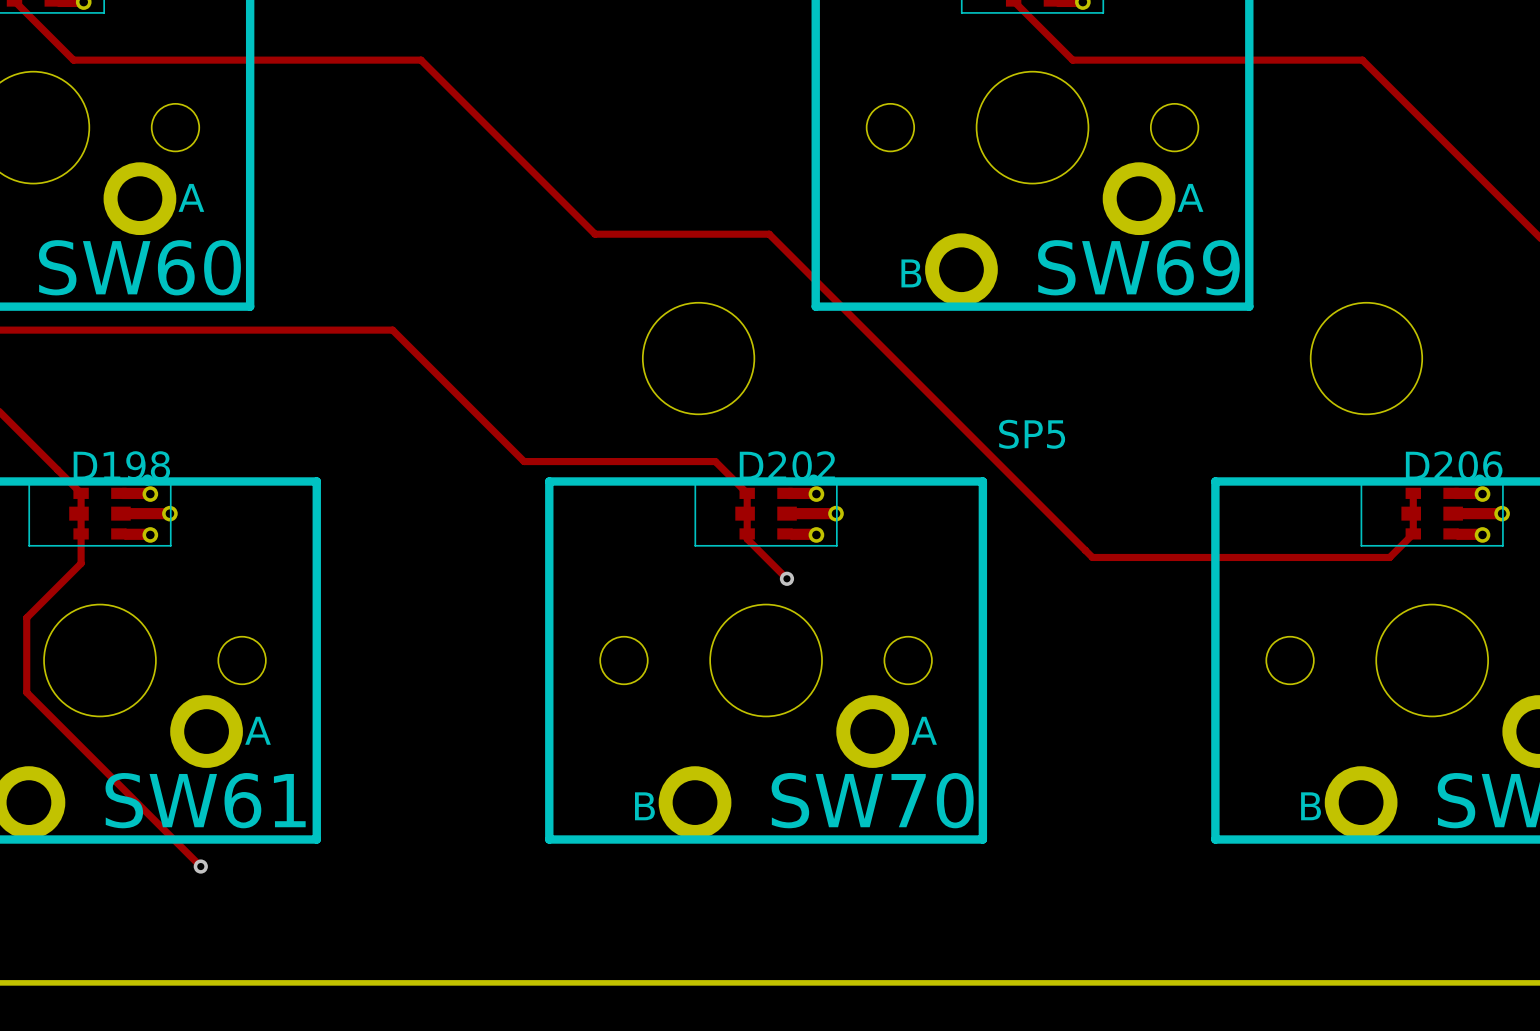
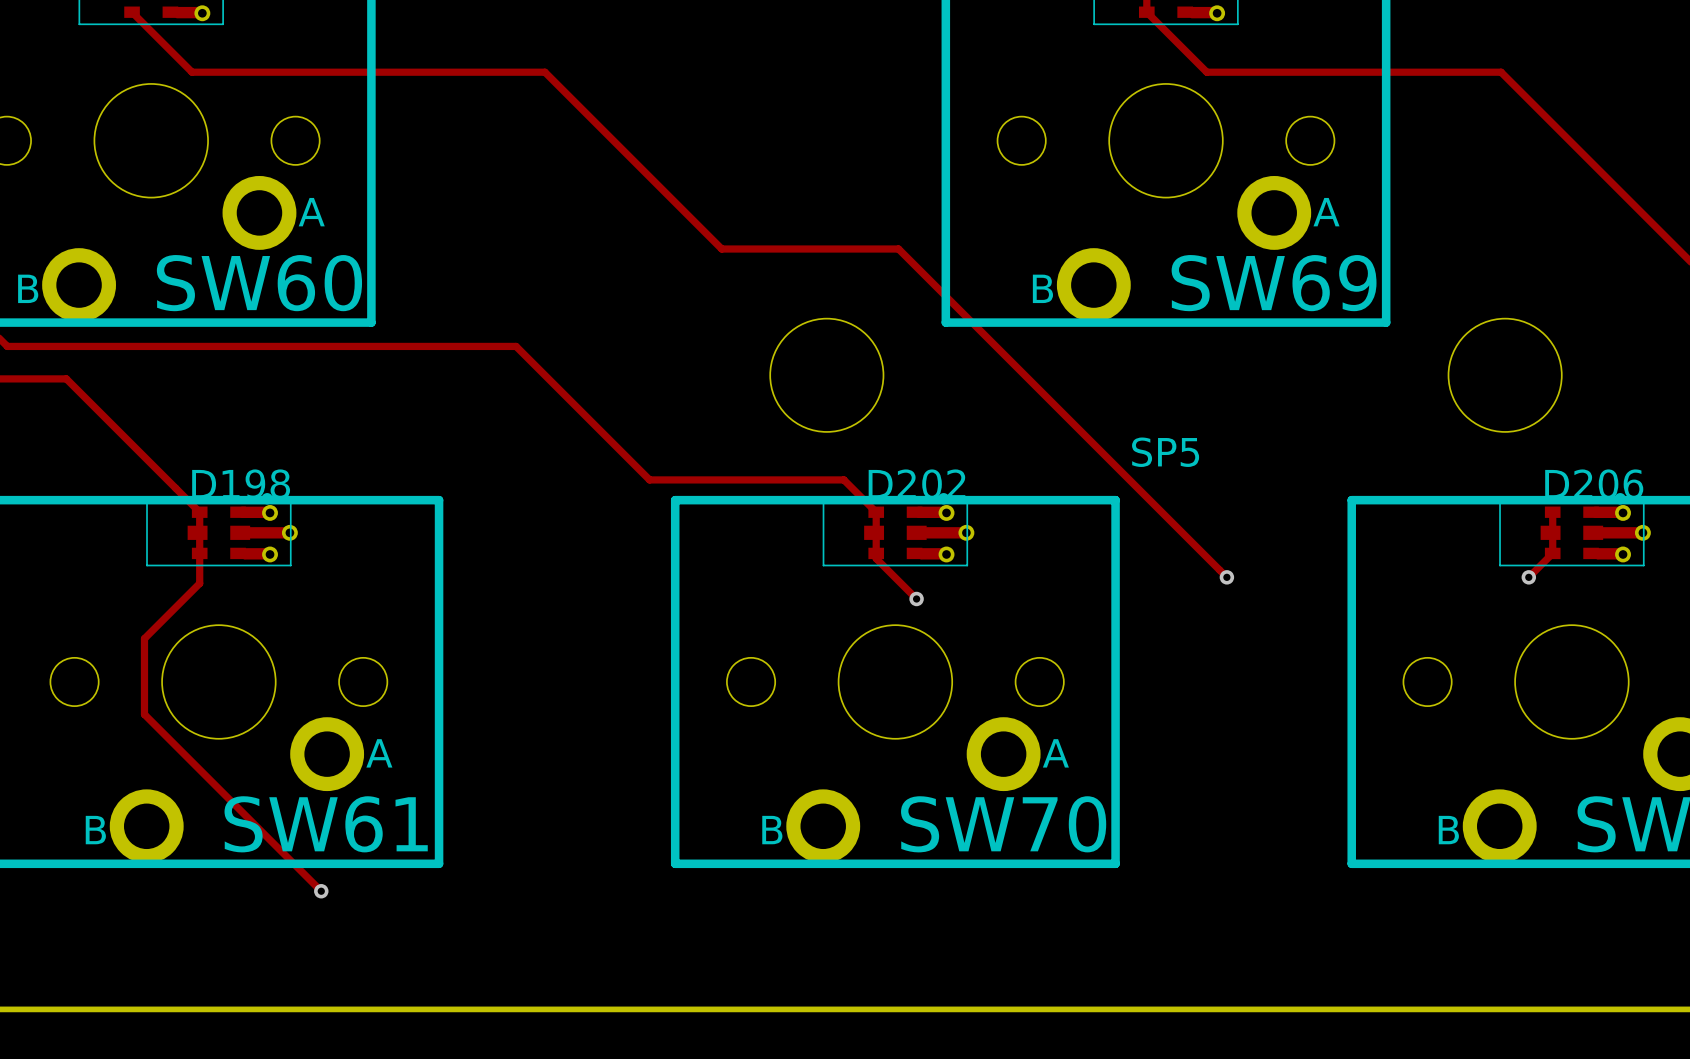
track: (1092, 557) (1389, 557) -> none
via: none -> (1226, 577)
via: none -> (1528, 577)

